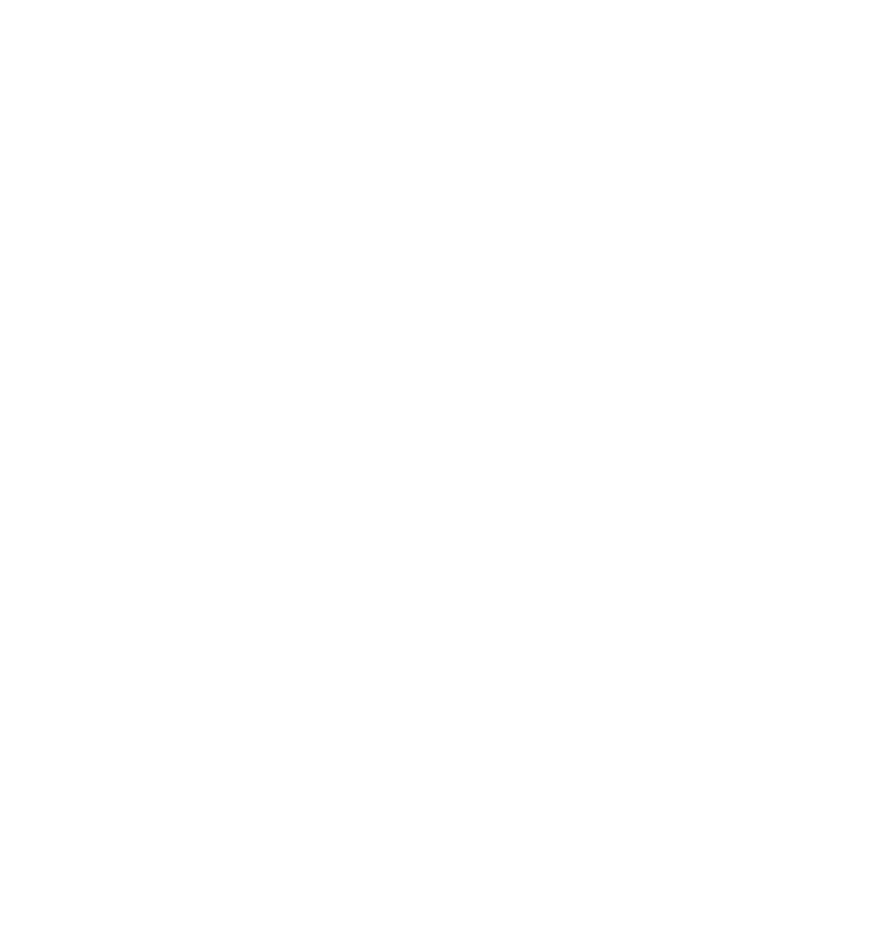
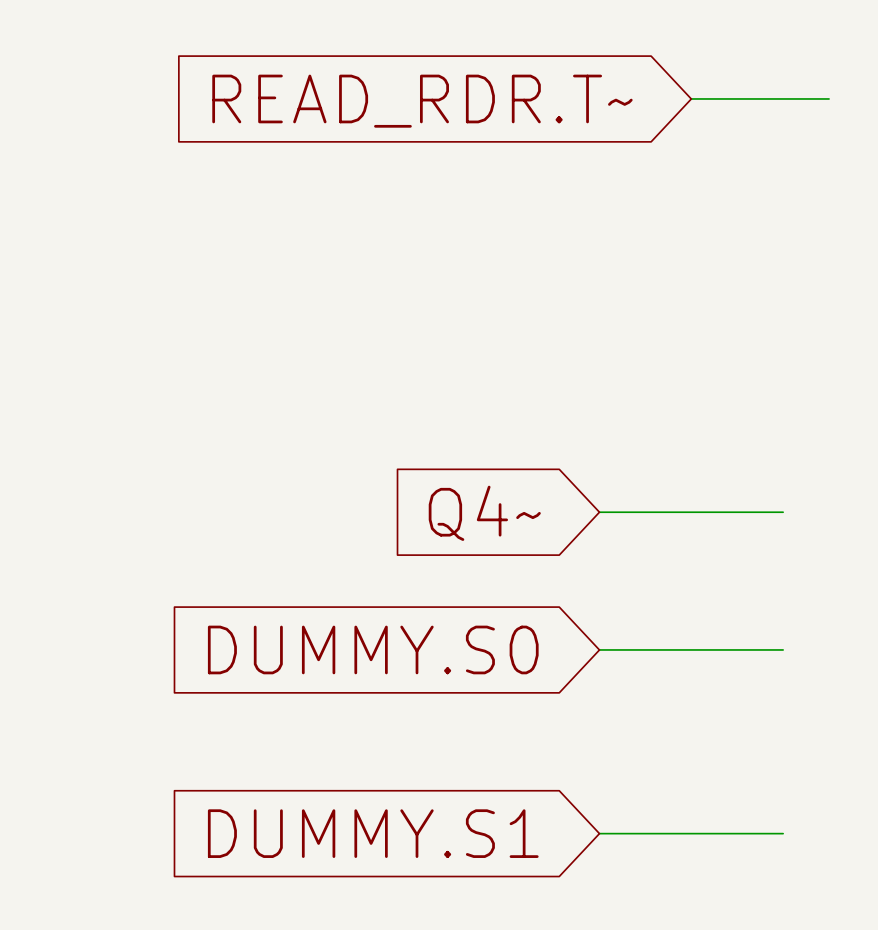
wire: none -> (691, 98) (829, 98)
global label: none -> READ_RDR.T~ (422, 101)
wire: none -> (599, 512) (783, 512)
global label: none -> Q4~ (484, 513)
global label: none -> DUMMY.S0 (373, 649)
wire: none -> (599, 649) (783, 649)
global label: none -> DUMMY.S1 (373, 833)
wire: none -> (599, 833) (783, 833)

